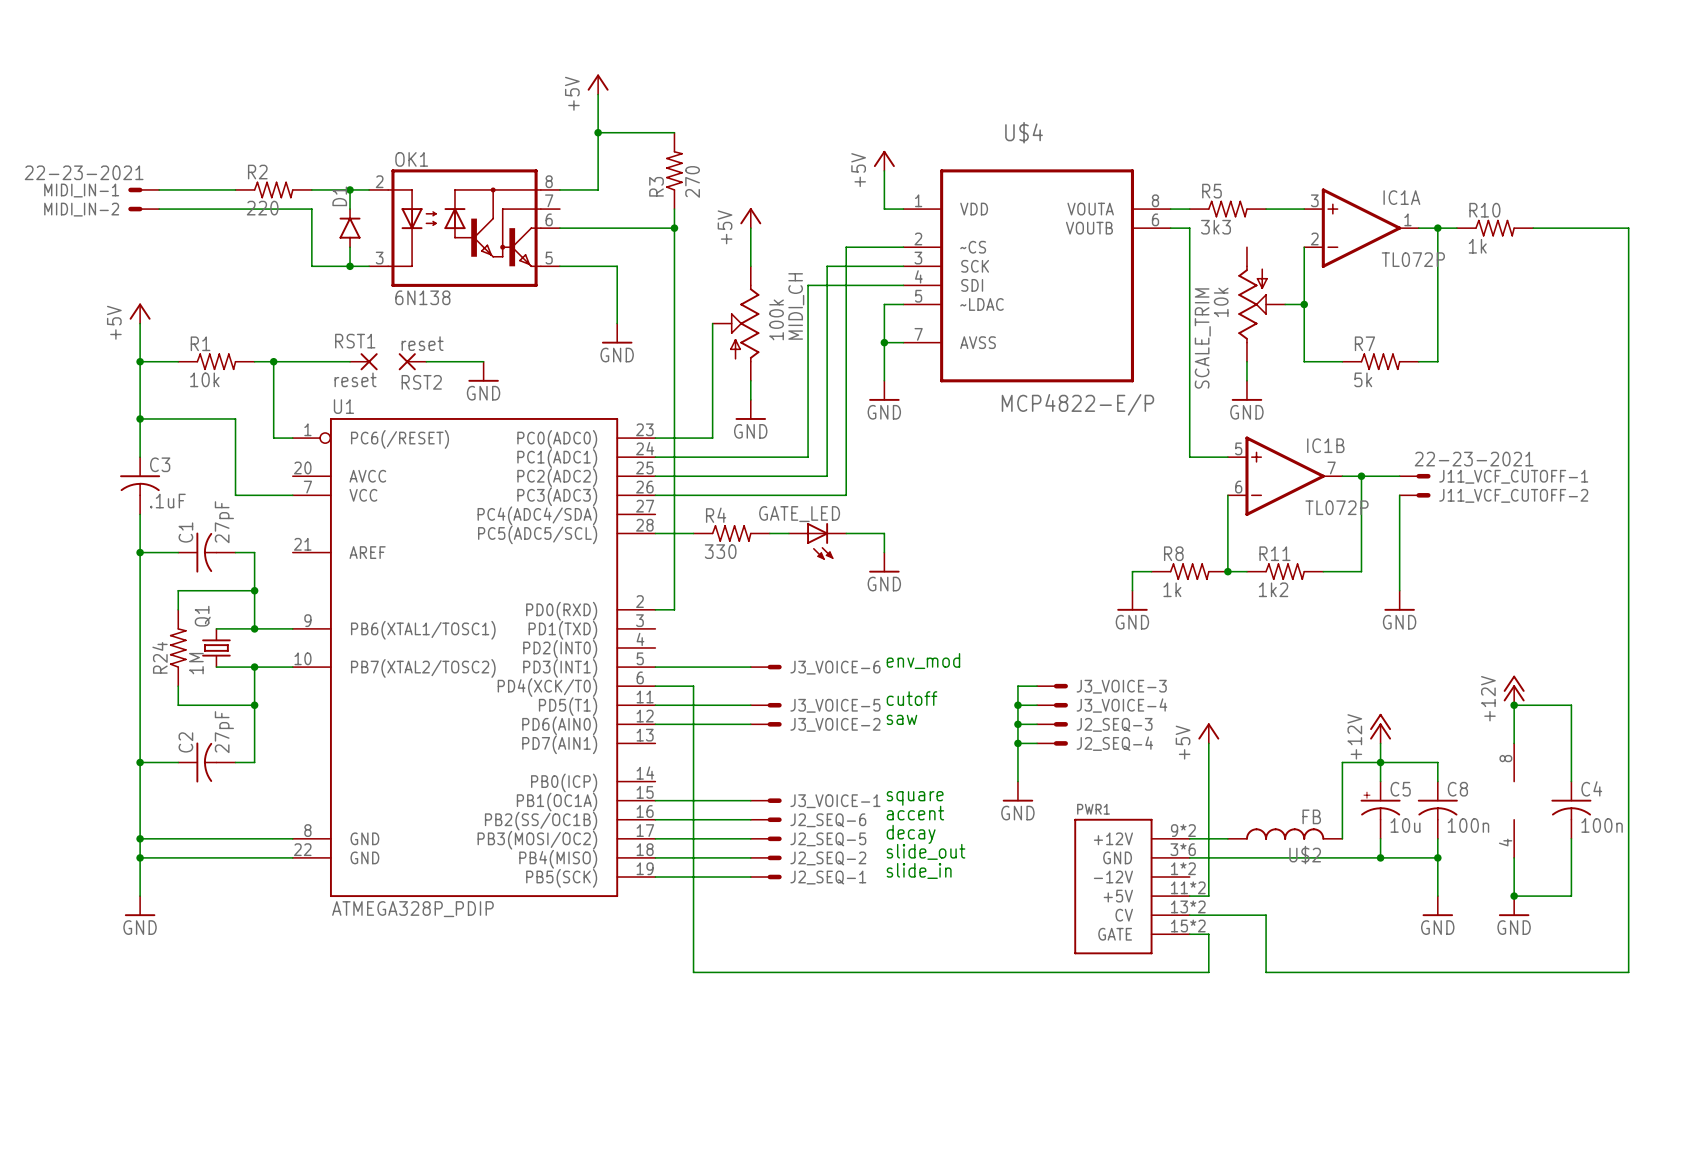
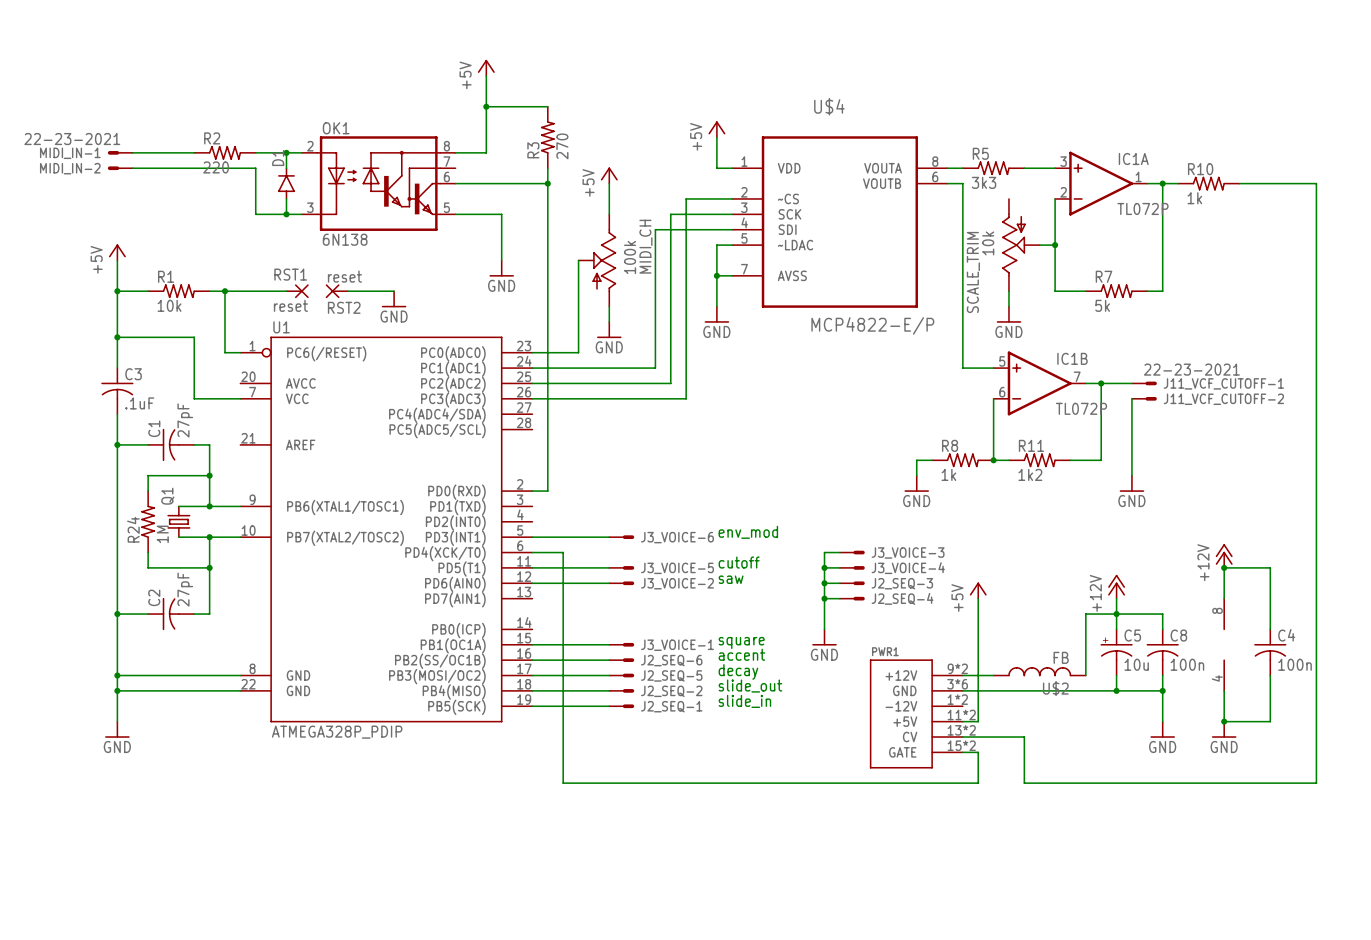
wire: (655, 533) (693, 533) -> none
R4: 330 (731, 533) -> none
wire: (769, 533) (788, 533) -> none
wire: (846, 533) (884, 533) (884, 552) -> none
GATE_LED: (817, 541) -> none
power symbol: GND (884, 562) -> none

